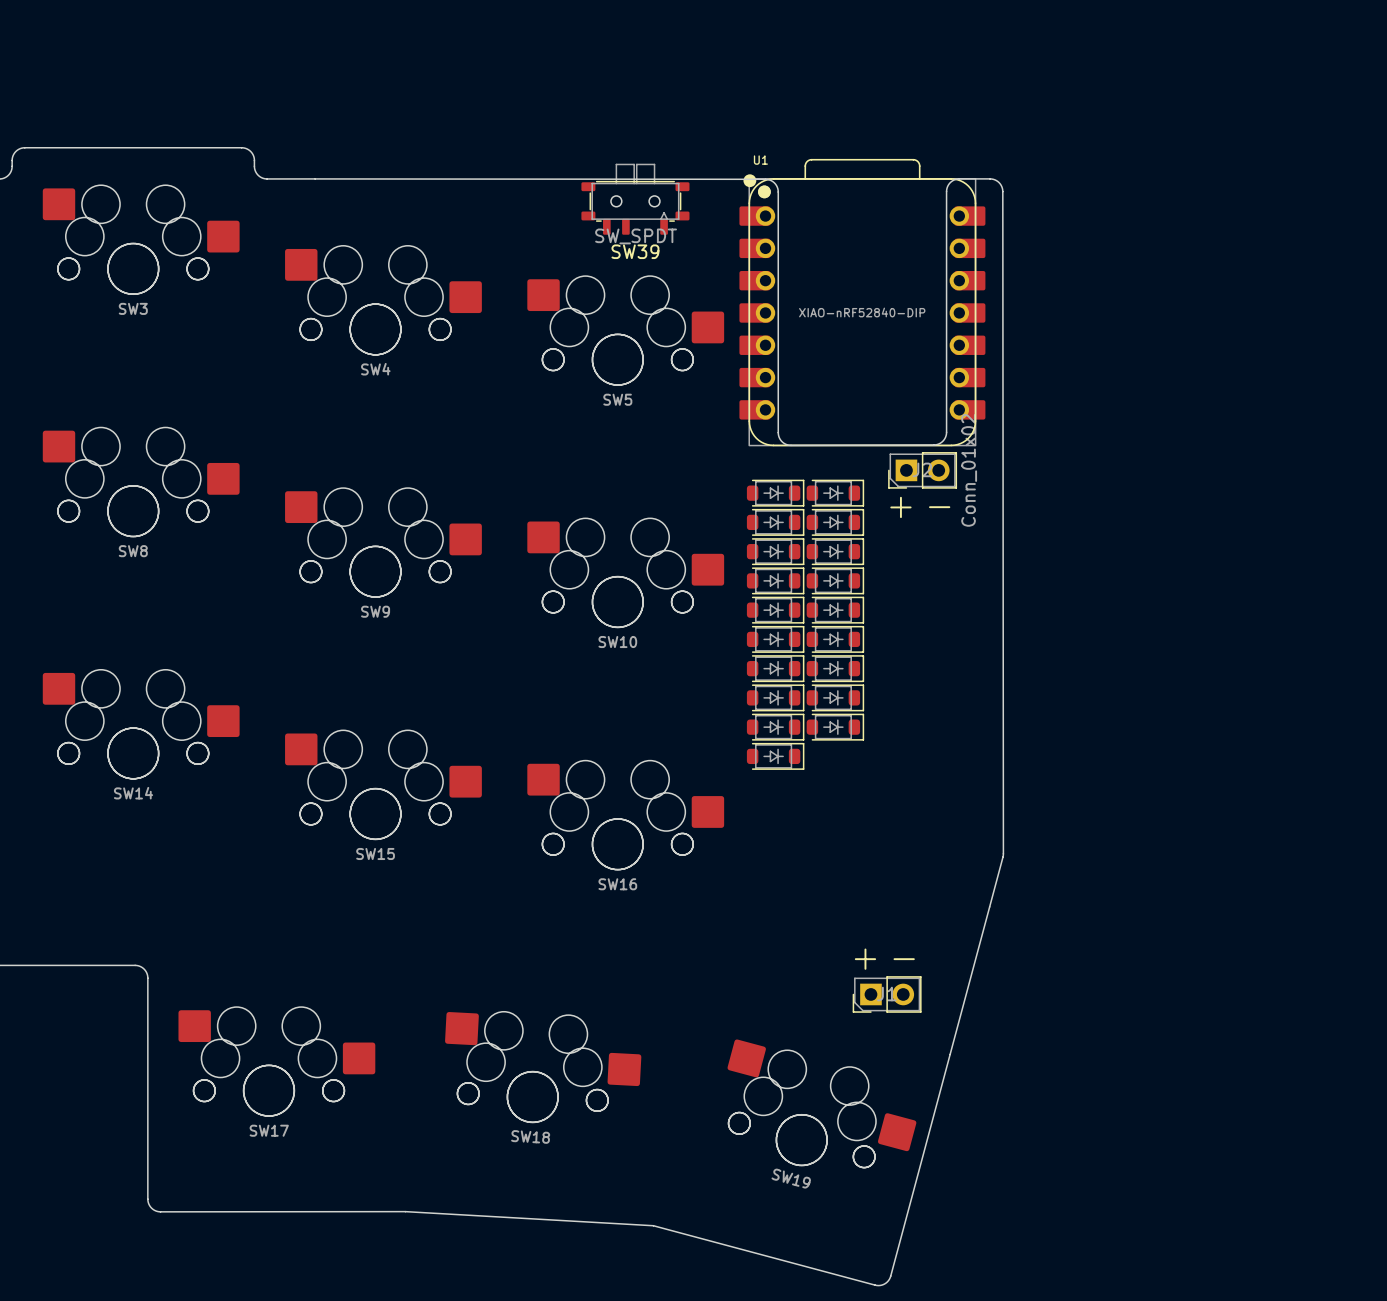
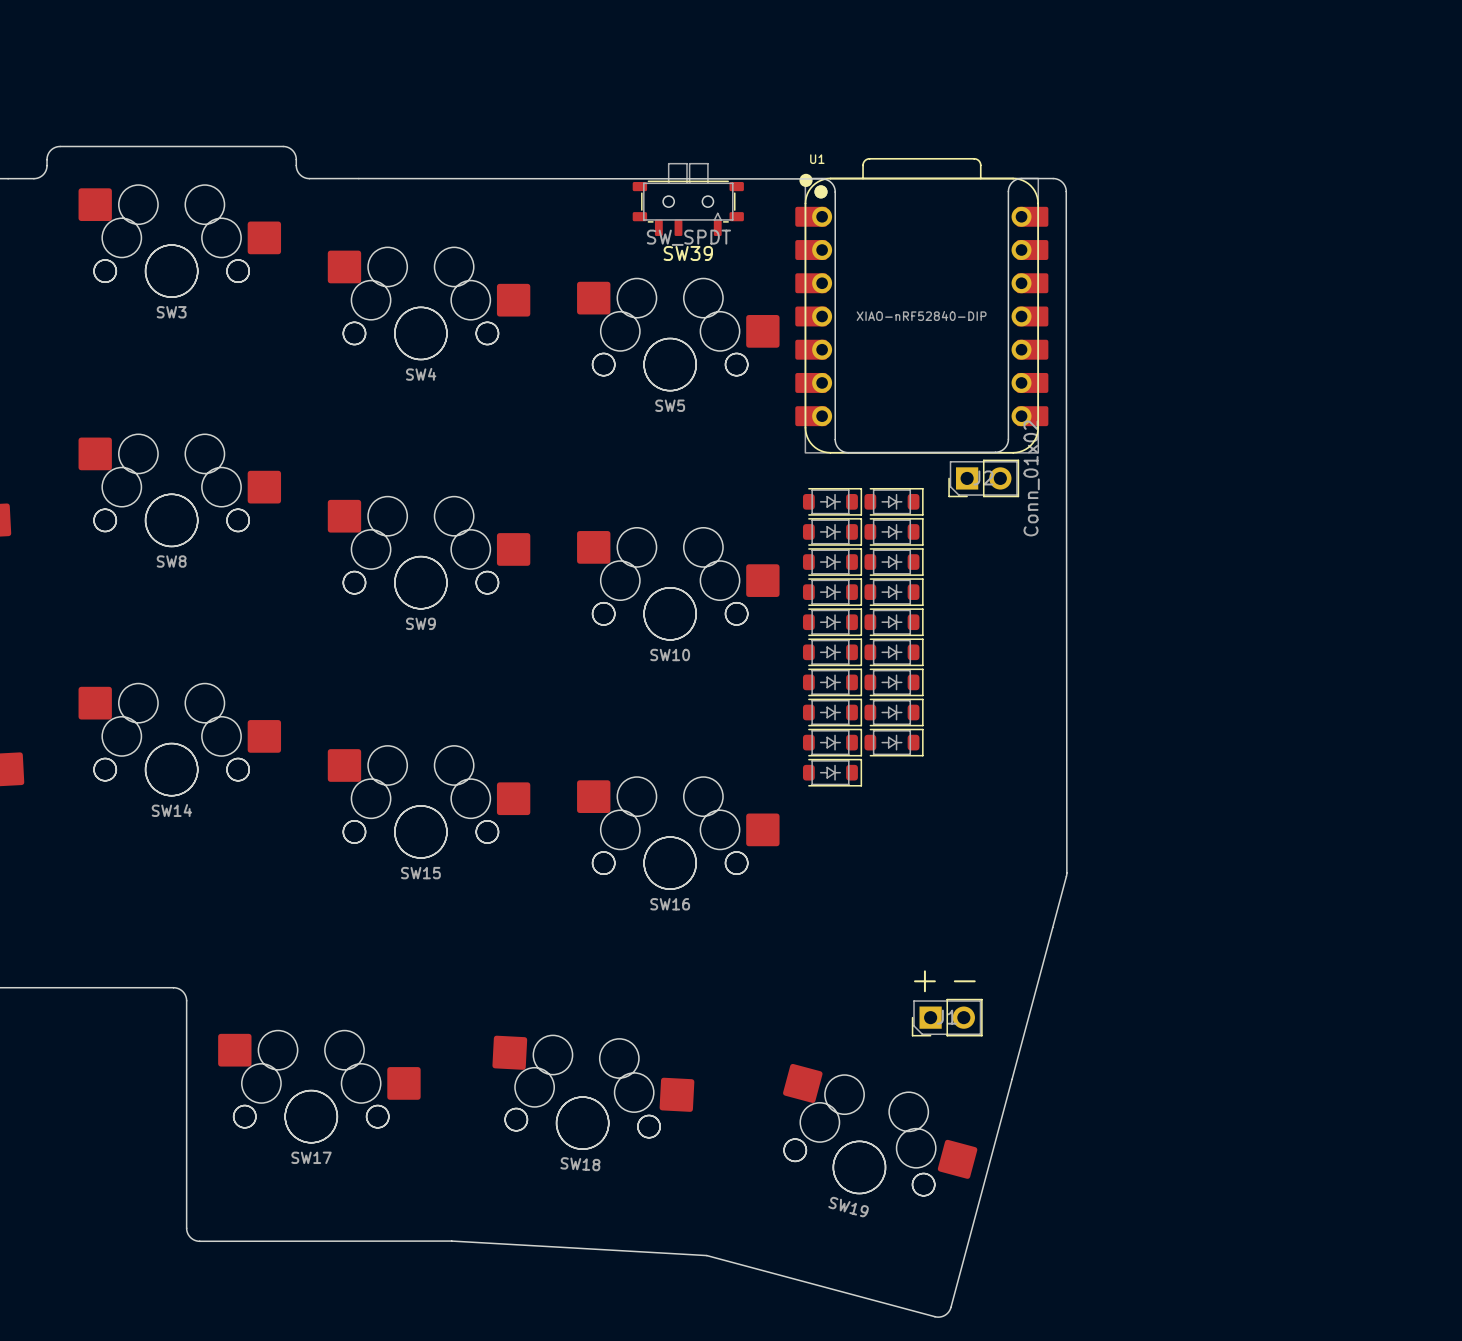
text: + (900, 507) -> none
text: - (939, 507) -> none

